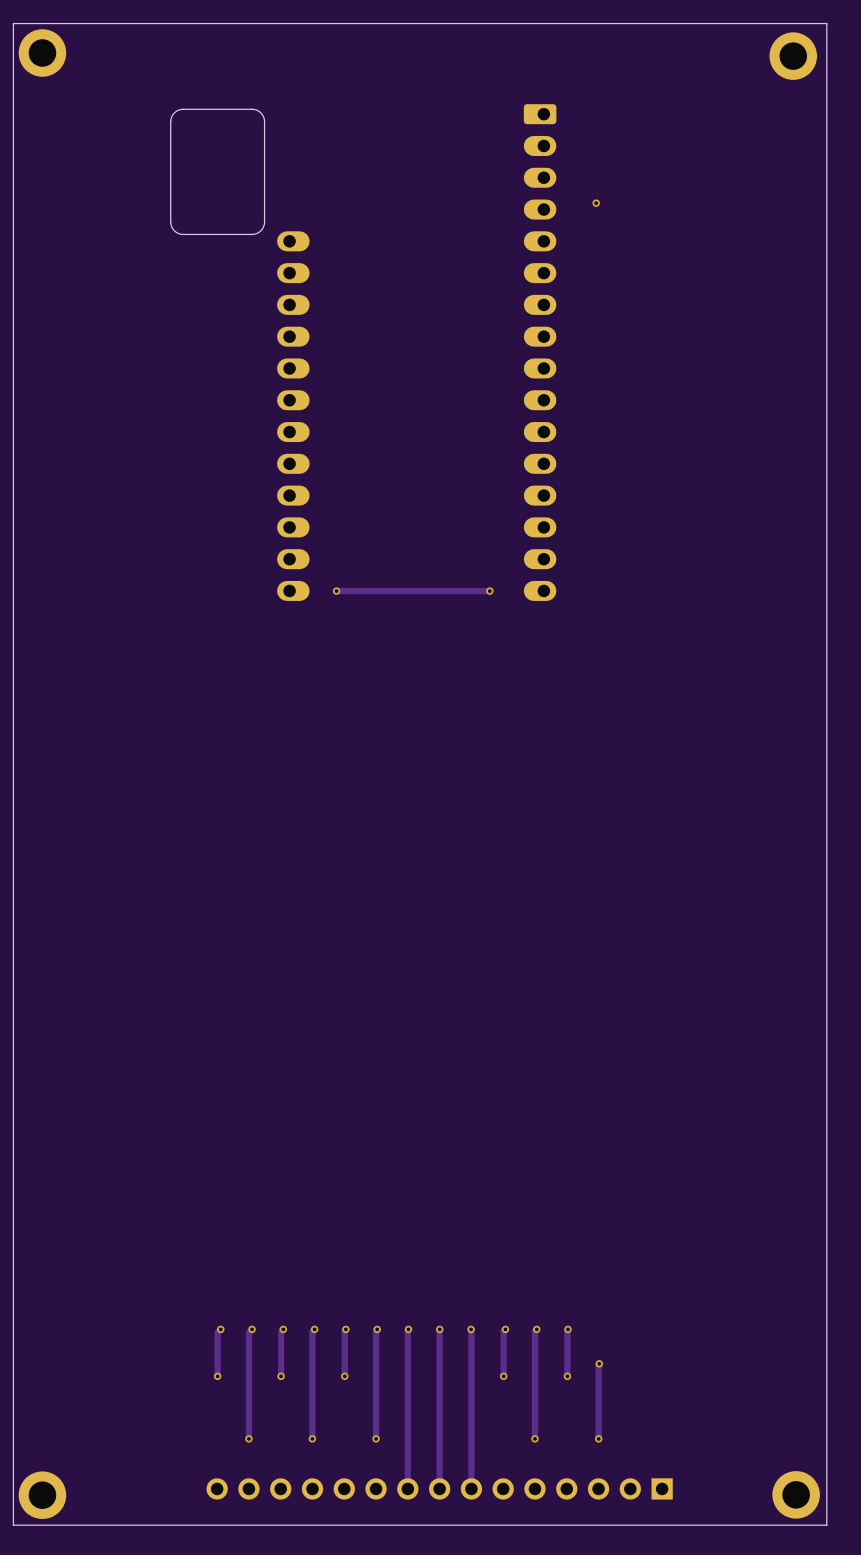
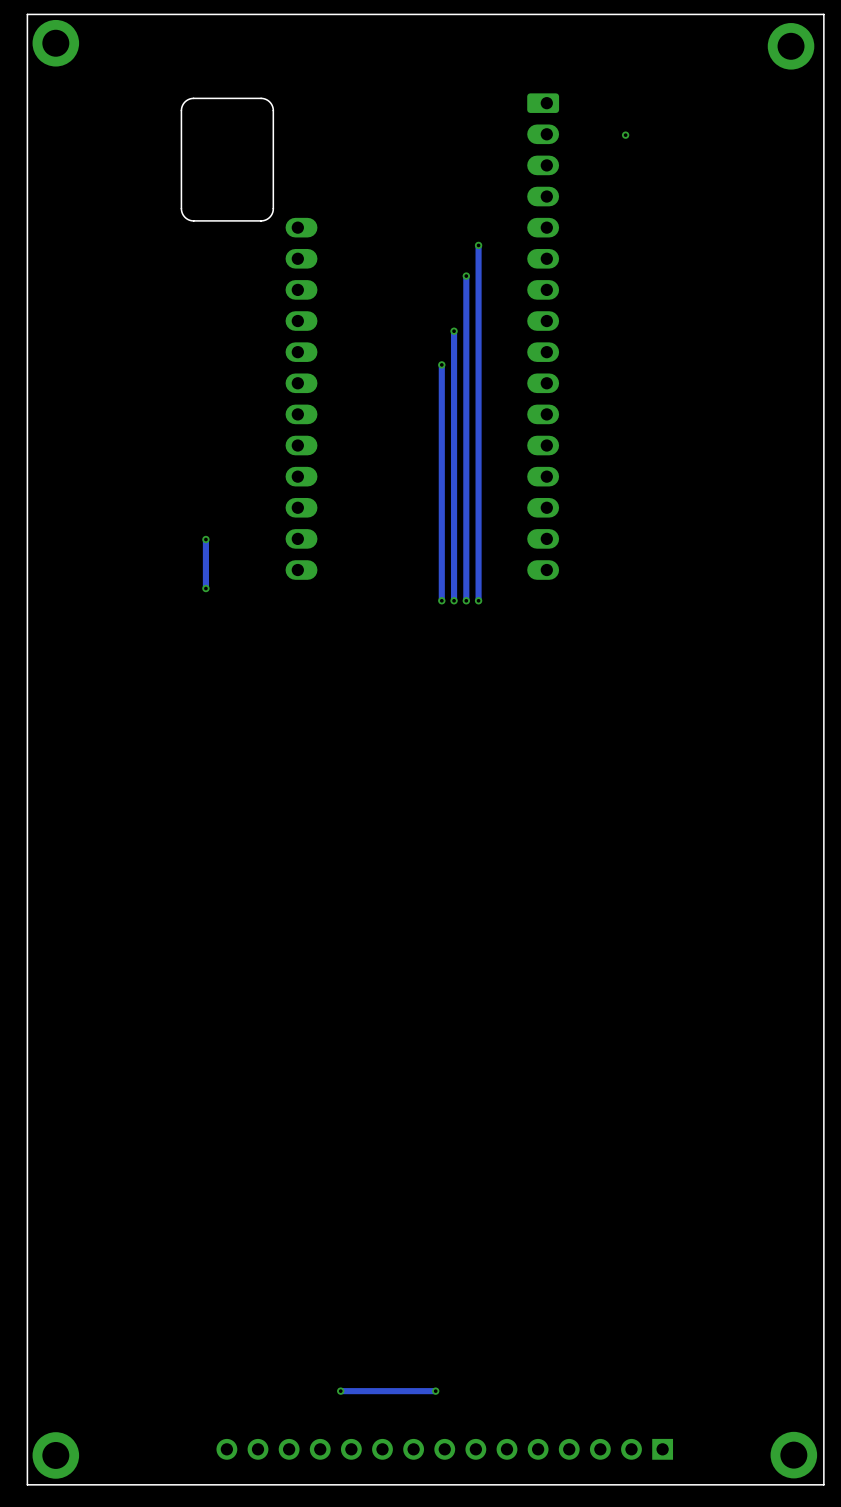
via position: (596, 203) -> (625, 135)
track: none -> (478, 245) (478, 600)
via: none -> (478, 245)
track: none -> (466, 276) (466, 600)
via: none -> (466, 276)
track: none -> (454, 331) (454, 600)
via: none -> (454, 331)
track: none -> (441, 364) (441, 600)
via: none -> (441, 364)
track: none -> (205, 539) (205, 588)
via: none -> (205, 539)
via: (336, 591) -> none
track: (489, 591) (336, 591) -> none
via: (489, 591) -> none
via: none -> (205, 588)
via: none -> (441, 600)
via: none -> (454, 600)
via: none -> (466, 600)
via: none -> (478, 600)
track: (220, 1329) (217, 1332) (217, 1376) -> none
via: (220, 1329) -> none
track: (252, 1329) (248, 1332) (248, 1438) -> none
via: (252, 1329) -> none
track: (283, 1329) (281, 1331) (281, 1376) -> none
via: (283, 1329) -> none
track: (314, 1329) (312, 1331) (312, 1438) -> none
via: (314, 1329) -> none
track: (345, 1329) (344, 1376) -> none
via: (345, 1329) -> none
track: (377, 1329) (376, 1438) -> none
via: (377, 1329) -> none
track: (408, 1329) (407, 1488) -> none
via: (408, 1329) -> none
track: (439, 1329) (439, 1488) -> none
via: (439, 1329) -> none
track: (471, 1329) (471, 1488) -> none
via: (471, 1329) -> none
track: (505, 1329) (503, 1331) (503, 1376) -> none
via: (505, 1329) -> none
track: (536, 1329) (534, 1331) (534, 1438) -> none
via: (536, 1329) -> none
track: (568, 1329) (567, 1376) -> none
via: (568, 1329) -> none
track: (599, 1363) (598, 1438) -> none
via: (599, 1363) -> none
via: (217, 1376) -> none
via: (281, 1376) -> none
via: (344, 1376) -> none
via: (503, 1376) -> none
via: (567, 1376) -> none
via: none -> (340, 1391)
track: none -> (435, 1391) (340, 1391)
via: none -> (435, 1391)
via: (248, 1438) -> none
via: (312, 1438) -> none
via: (376, 1438) -> none
via: (534, 1438) -> none
via: (598, 1438) -> none

